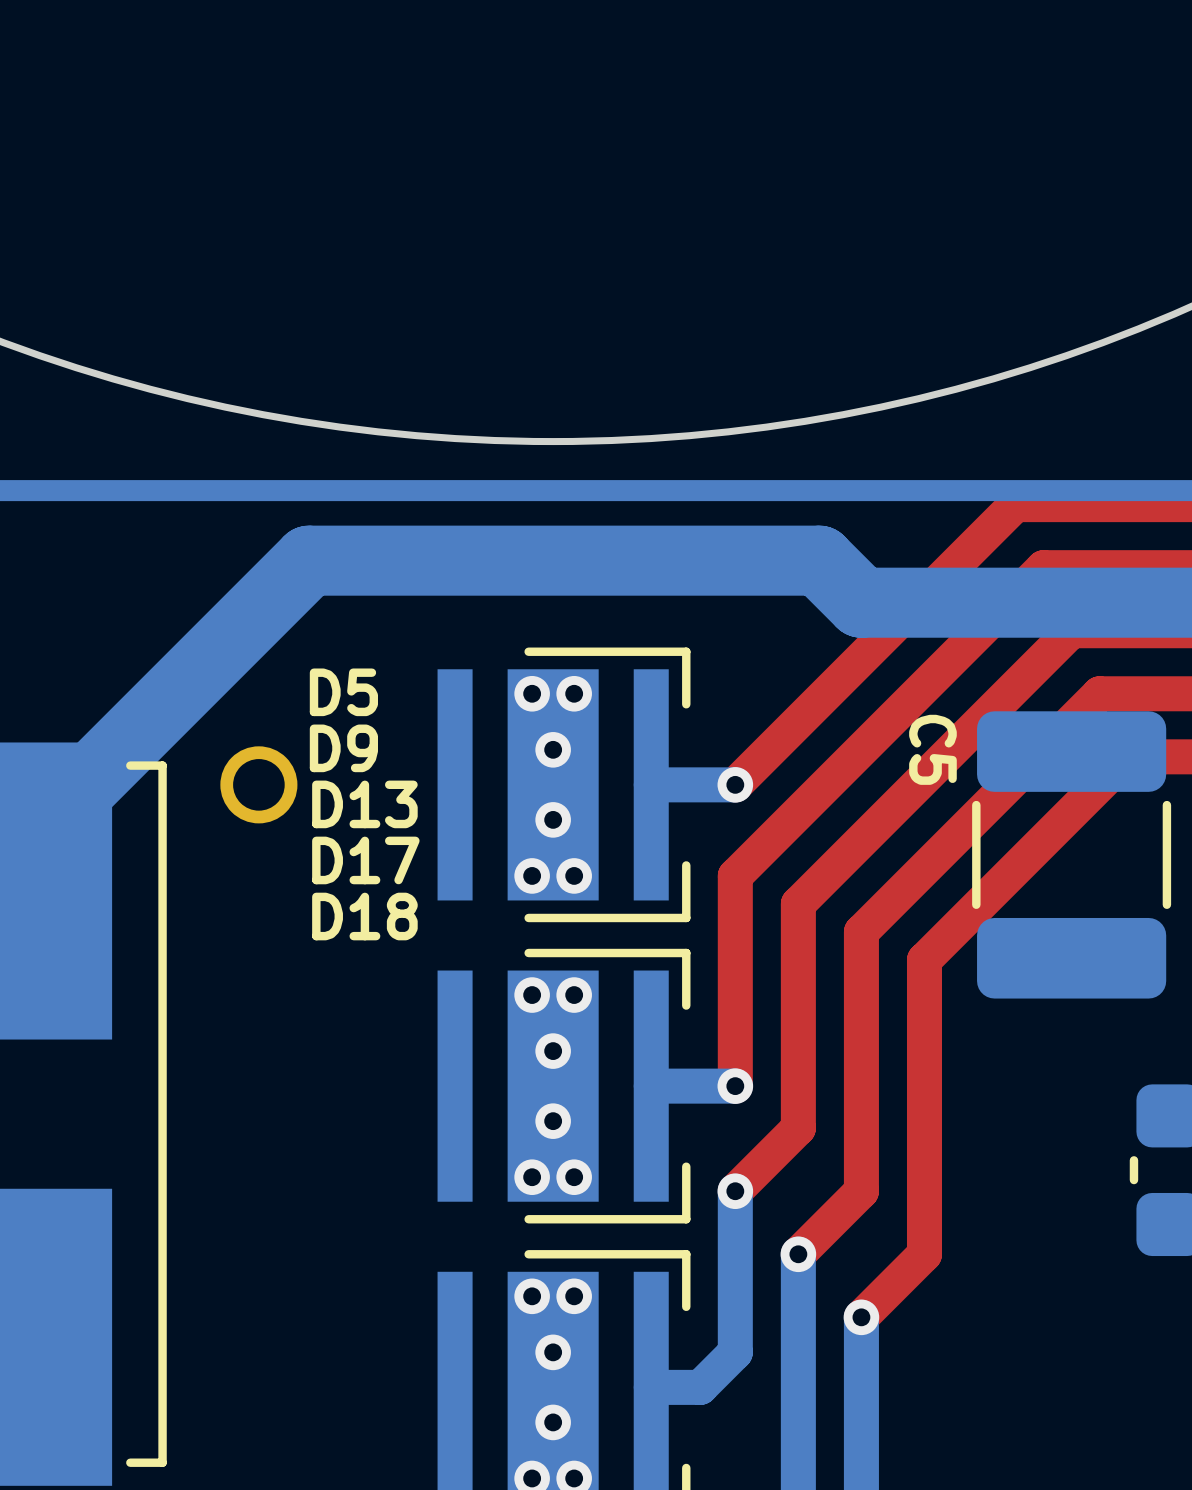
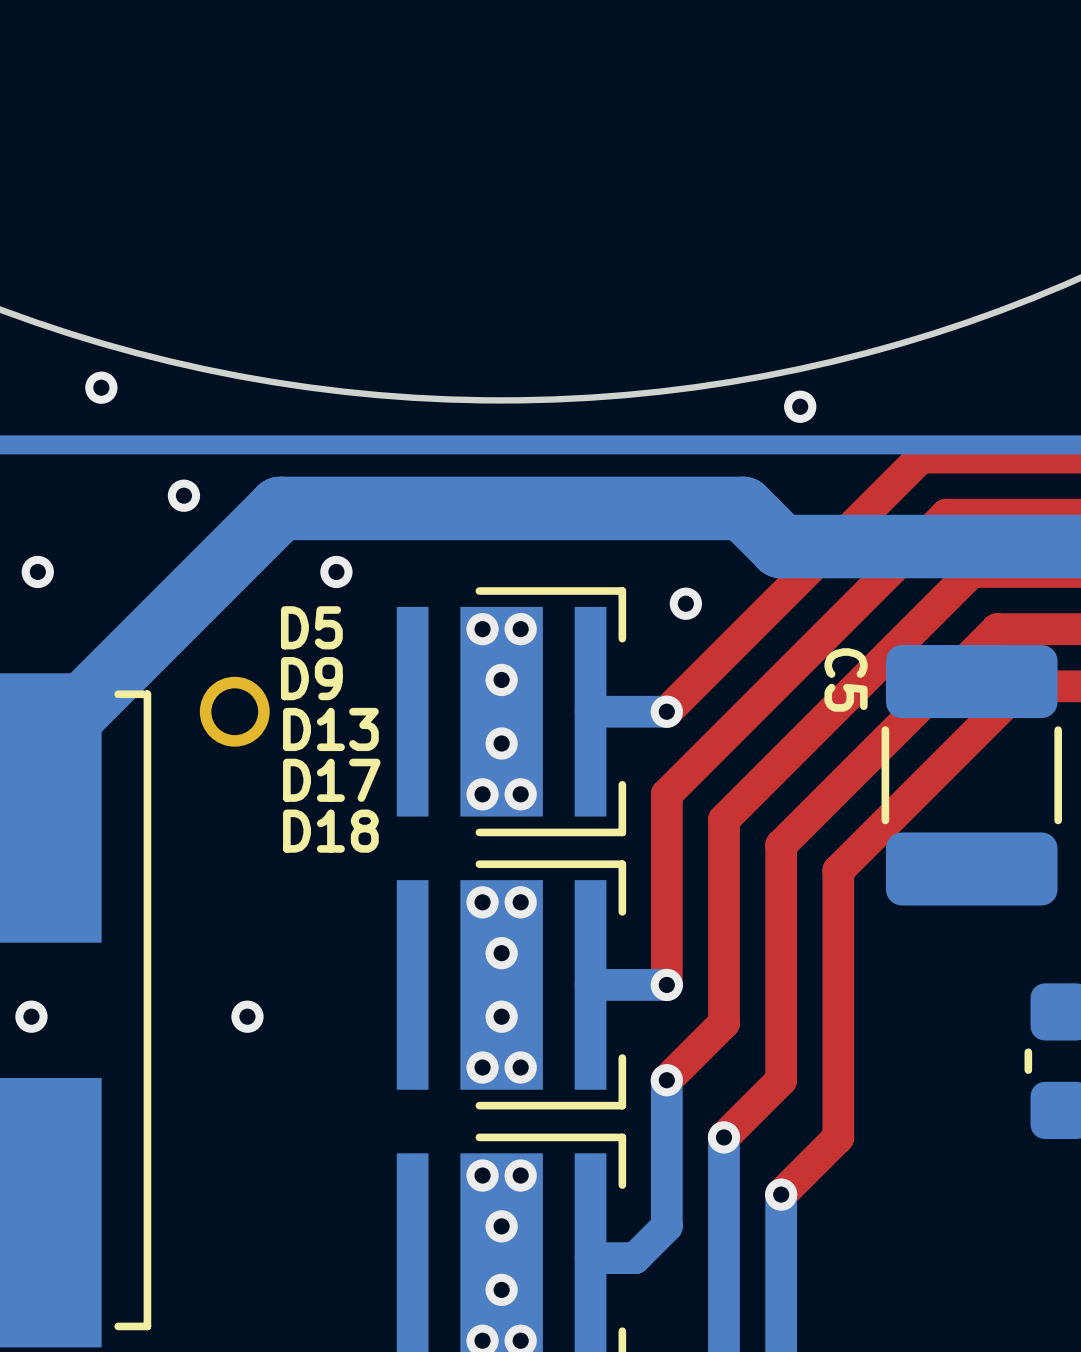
via: none -> (101, 387)
via: none -> (800, 406)
via: none -> (183, 495)
via: none -> (37, 571)
via: none -> (336, 571)
via: none -> (685, 603)
via: none -> (31, 1016)
via: none -> (247, 1016)

